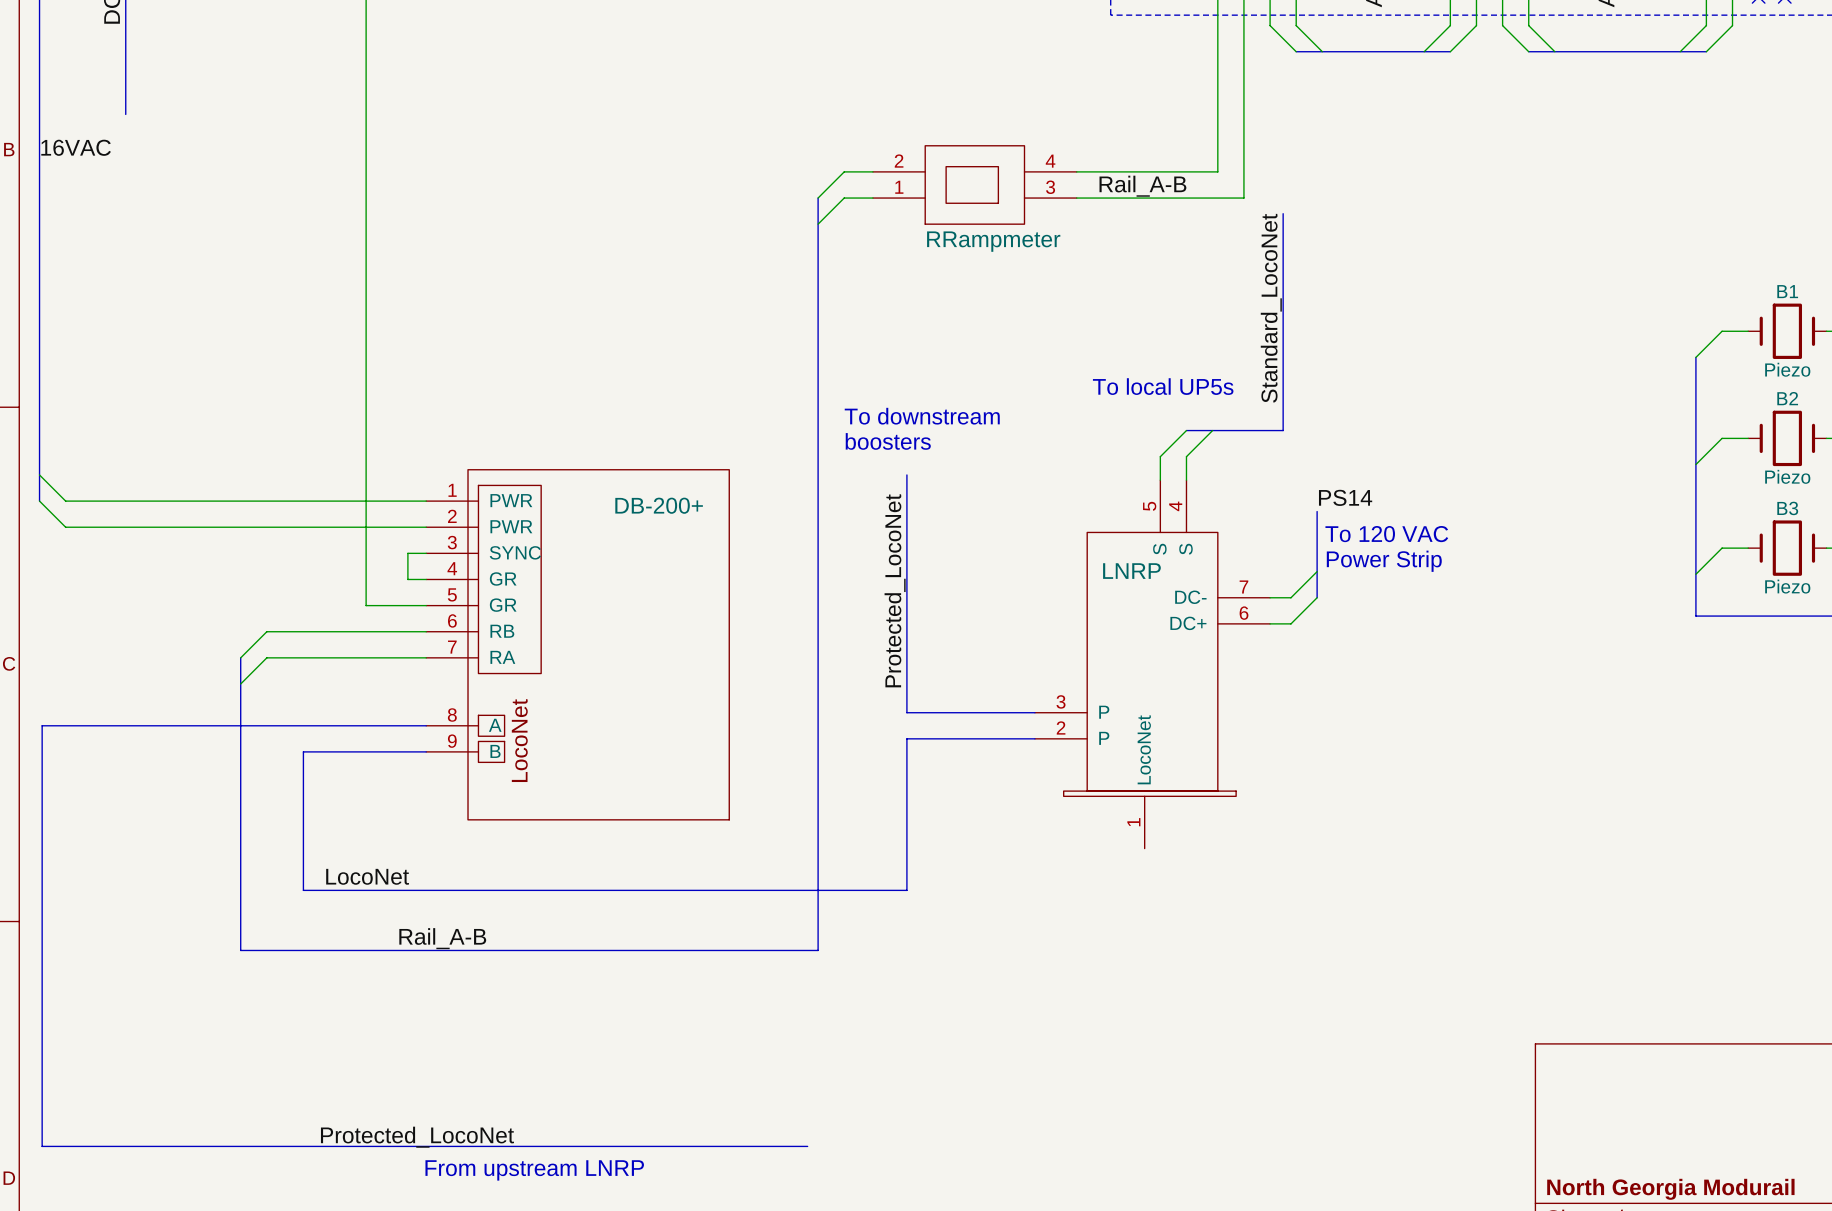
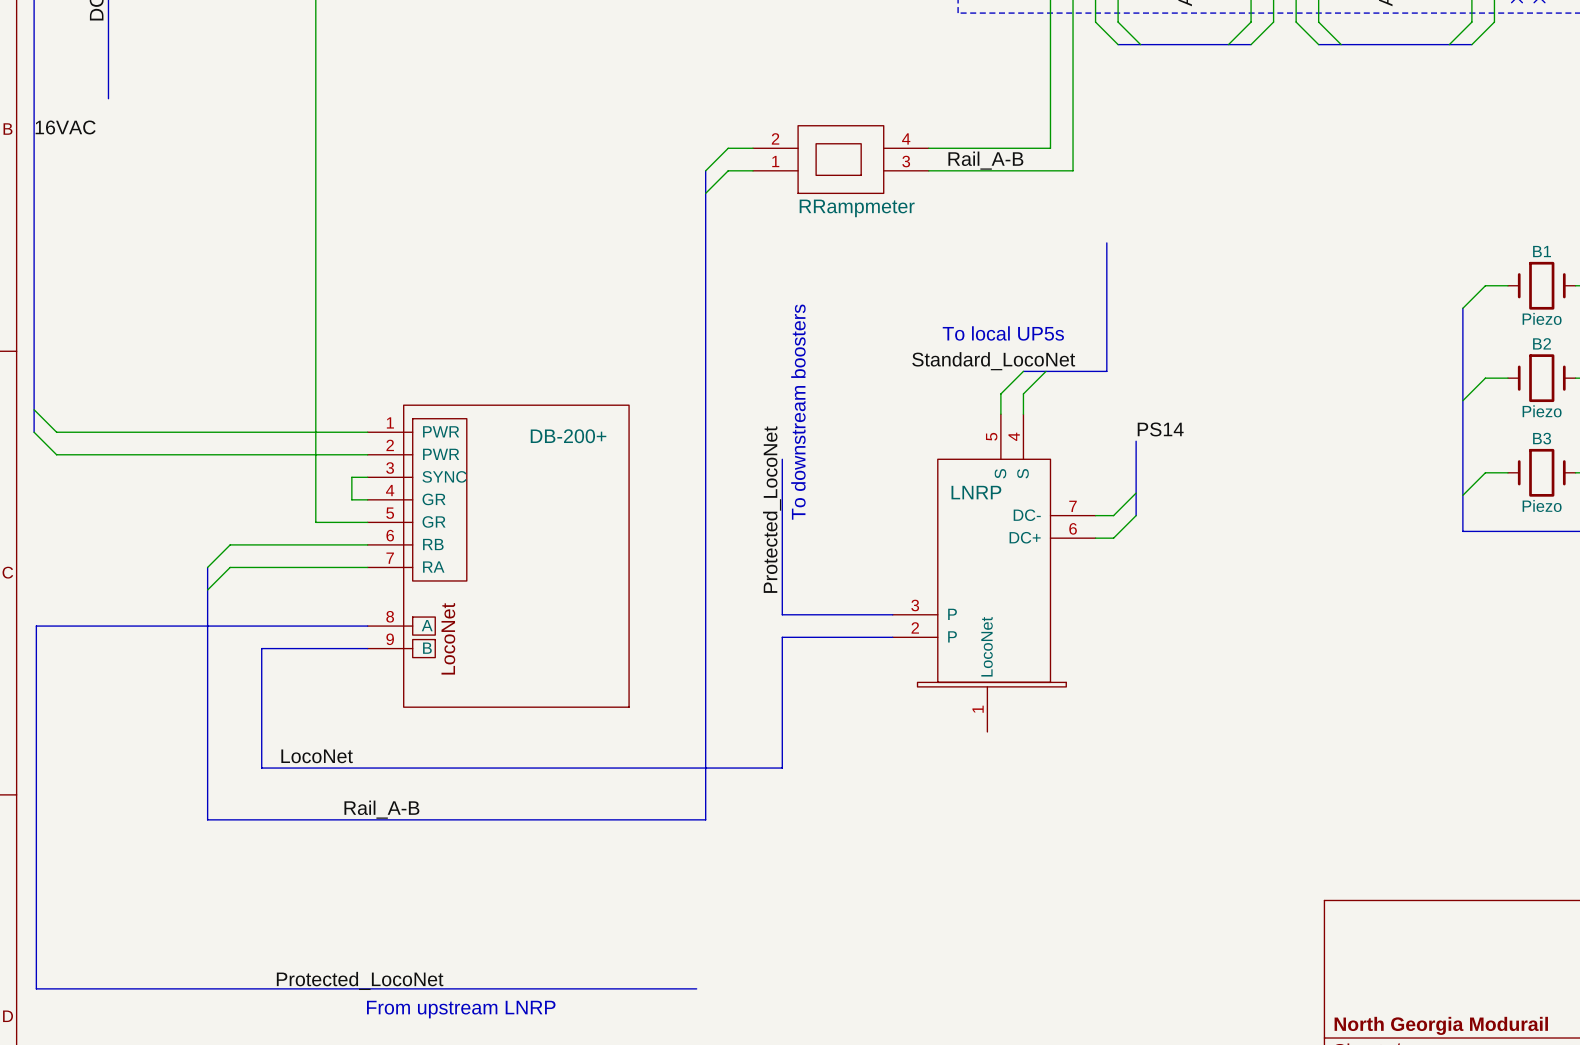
bus: (1283, 213) (1283, 281) -> none
label rotation: 0° (1271, 308) -> 90° clockwise (993, 361)
text: To downstream (922, 416) -> To downstream boosters (798, 412)
text: boosters (888, 441) -> none
bus: (906, 474) (906, 532) -> none
text: To 120 VAC (1386, 534) -> none
text: Power Strip (1384, 561) -> none

